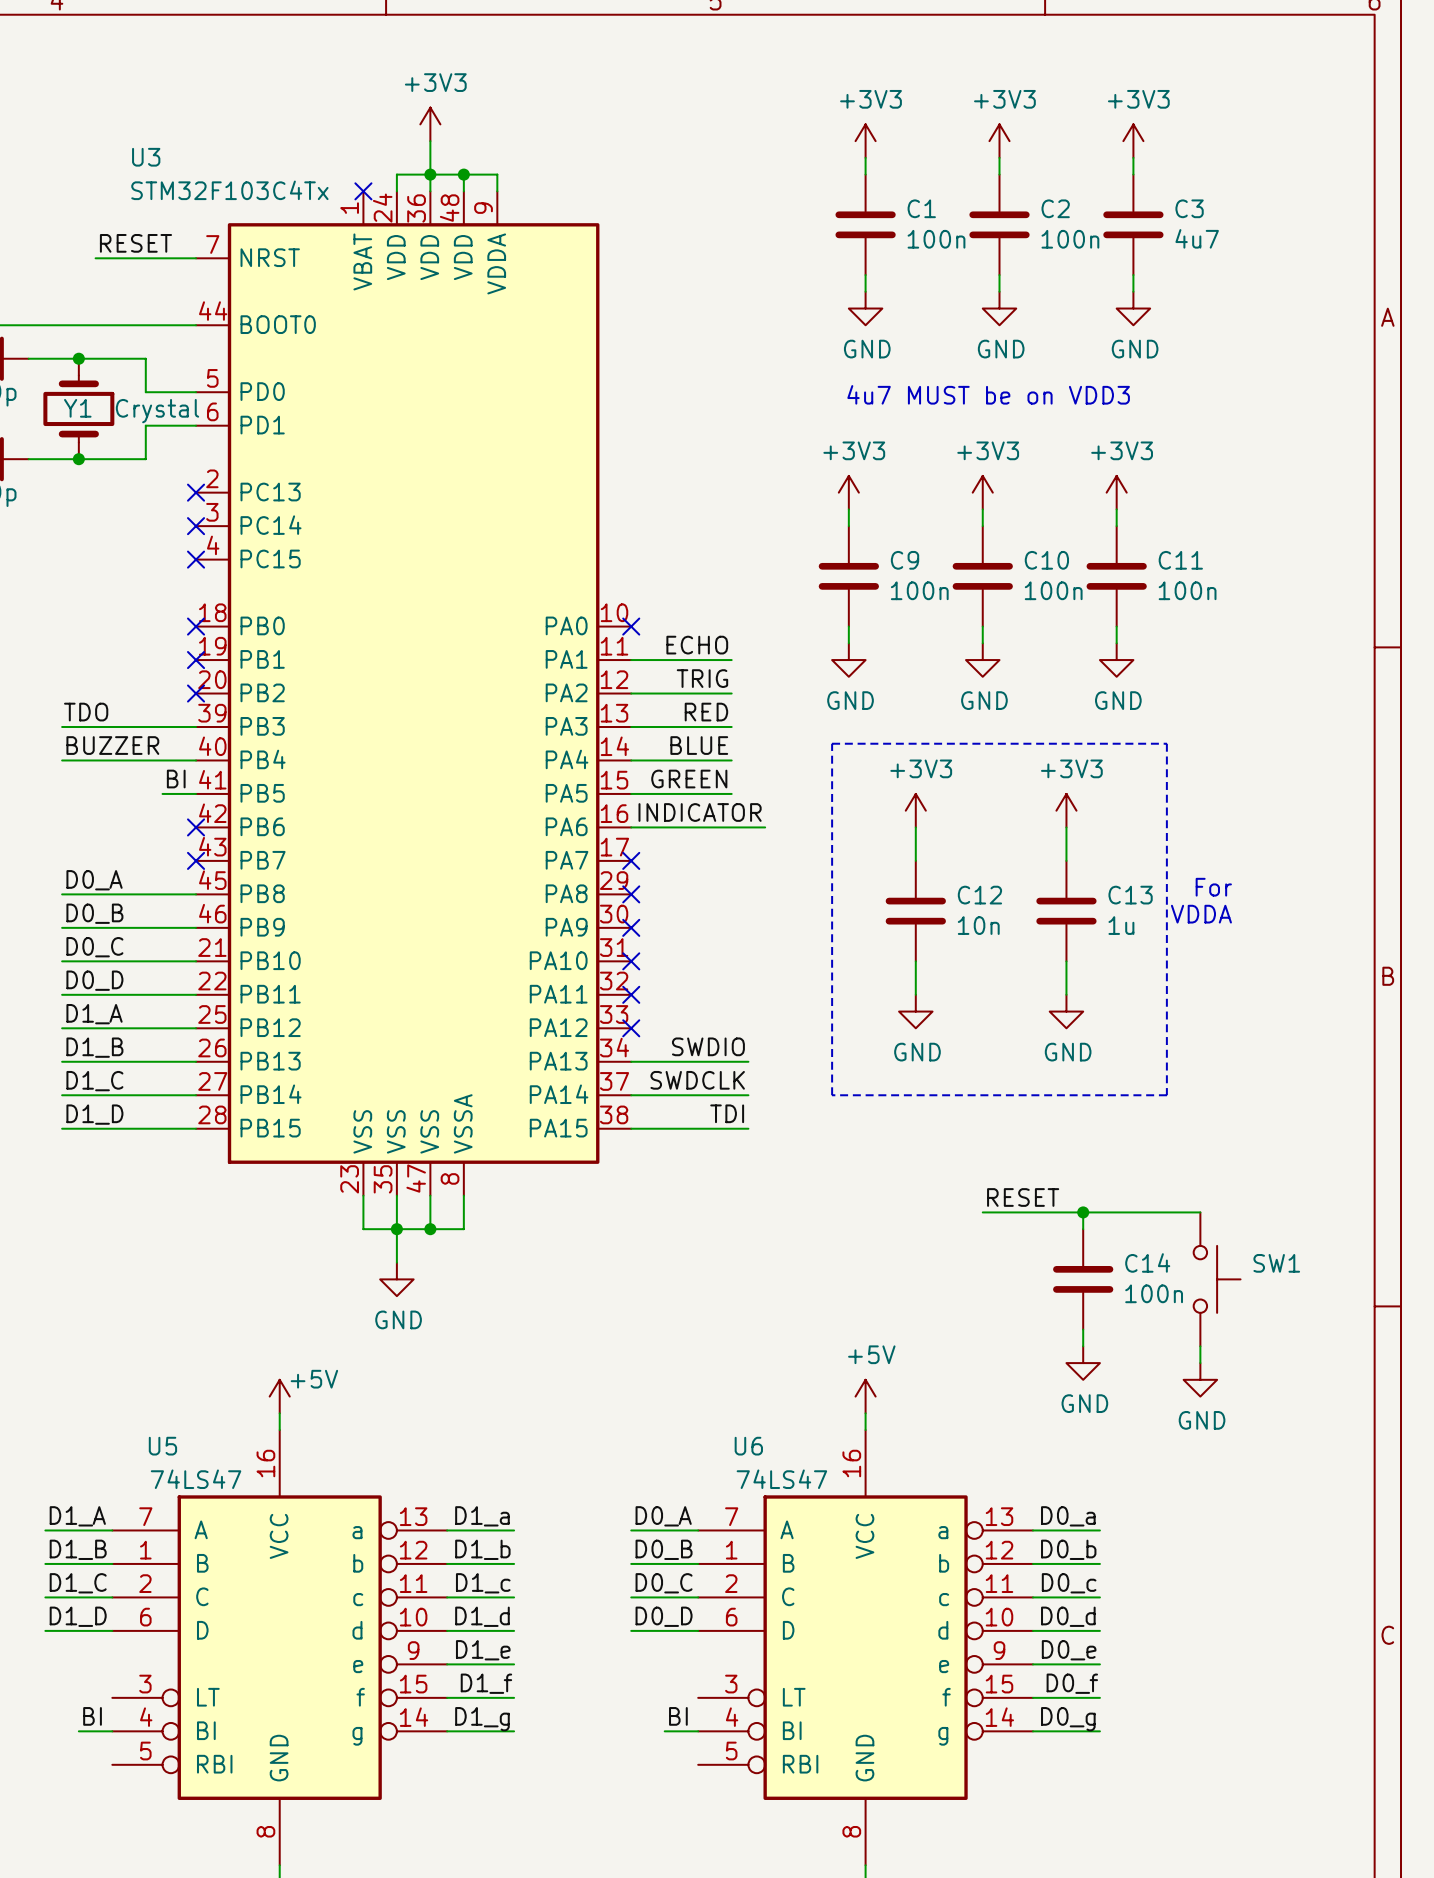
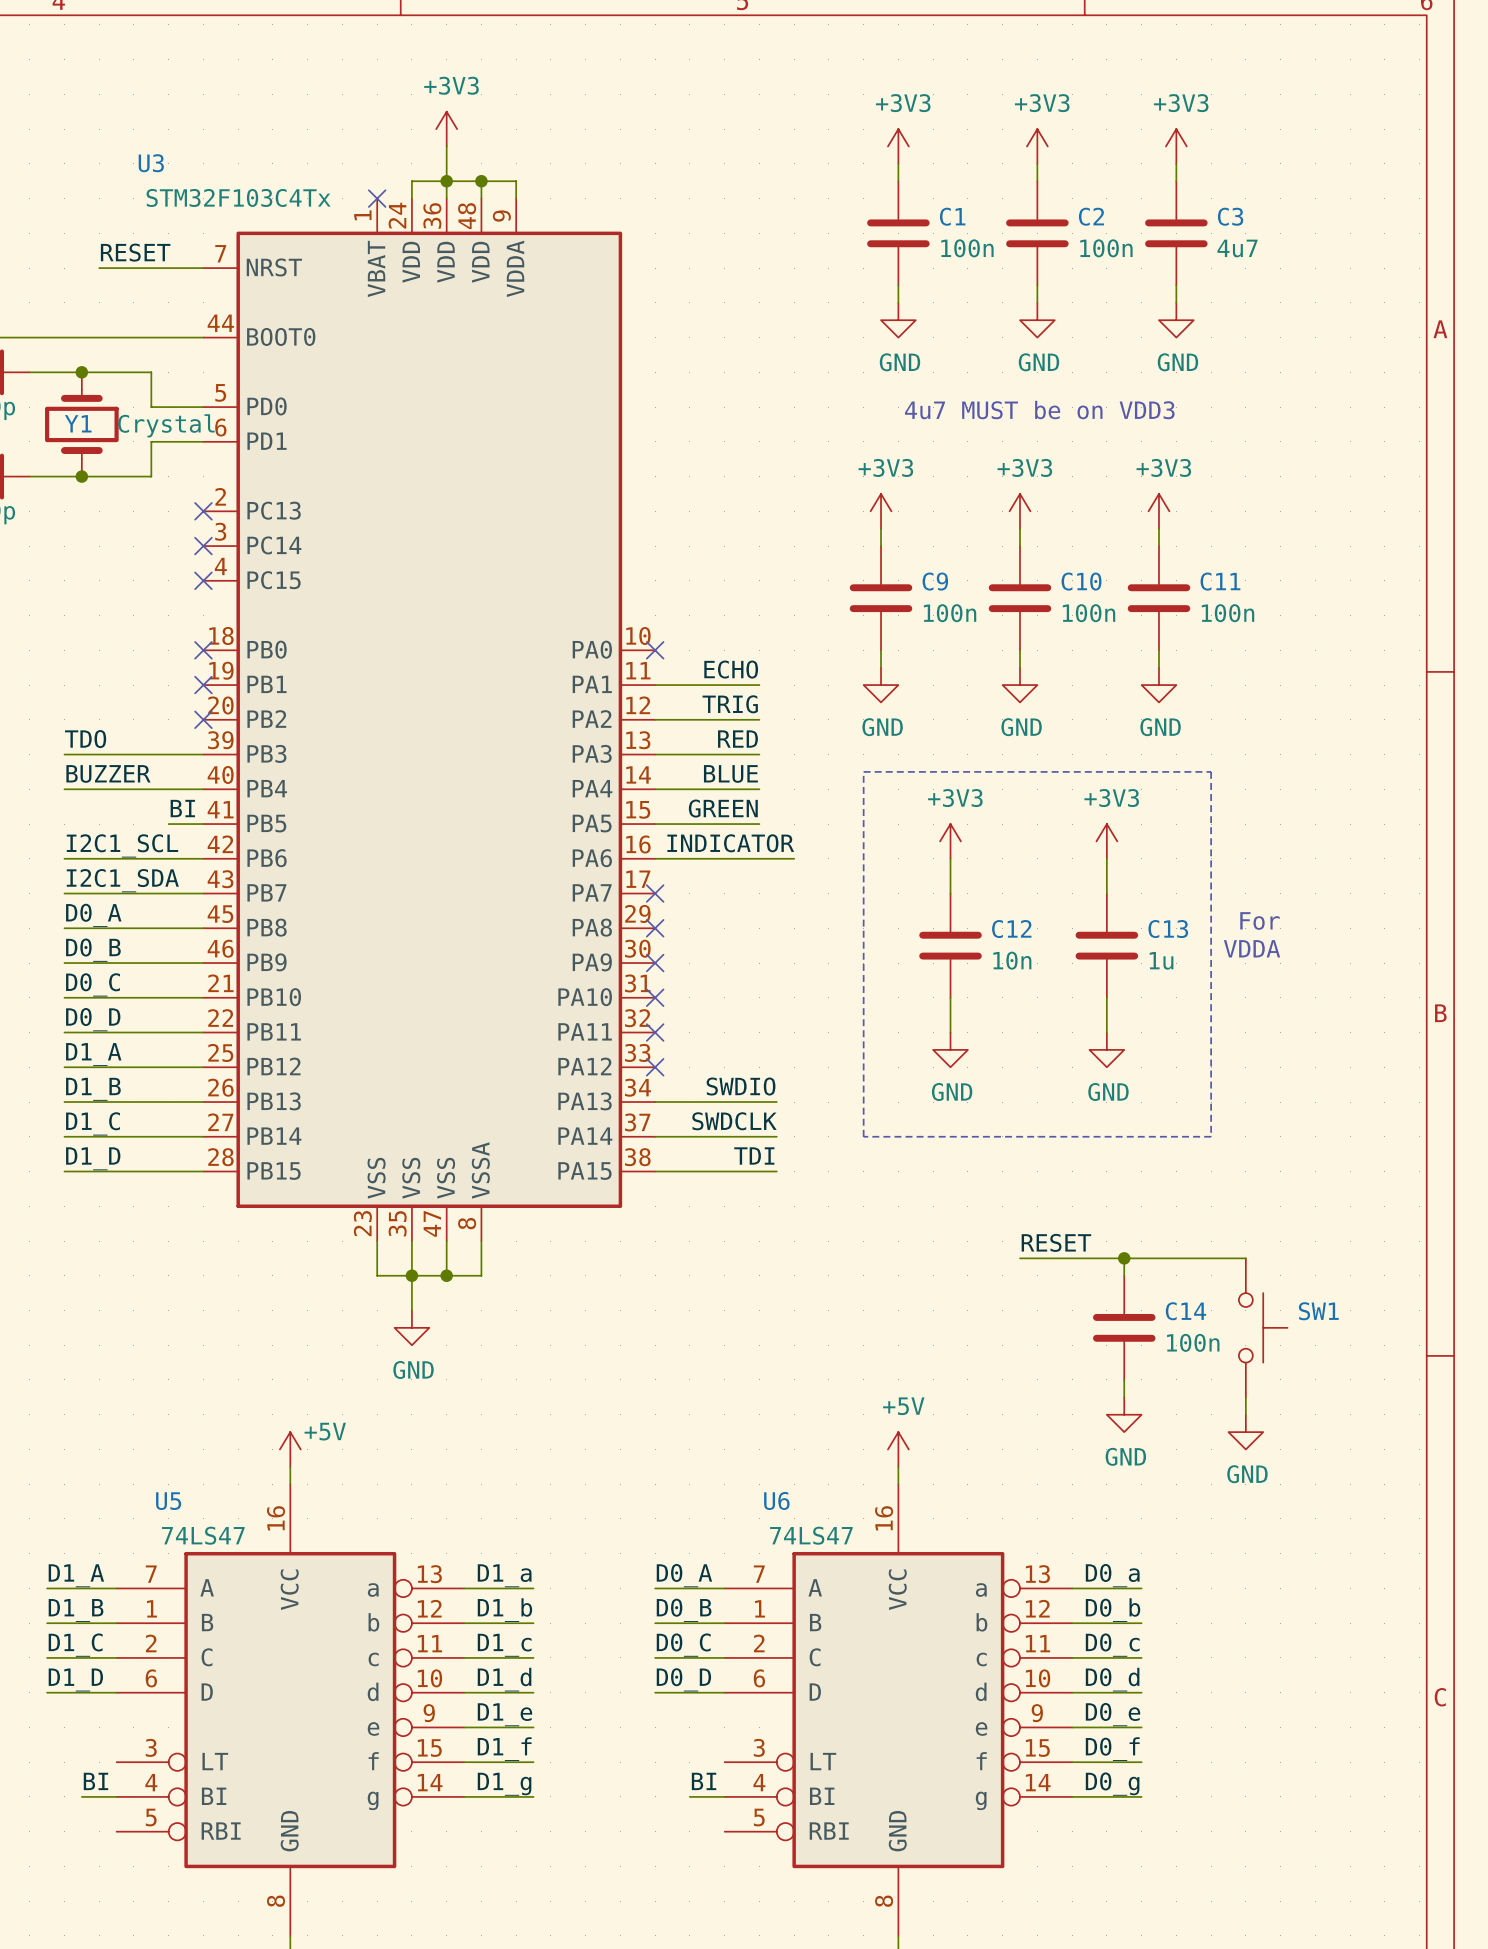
label: none -> I2C1_SCL (122, 845)
wire: none -> (64, 858) (203, 858)
no-connect mark: (196, 827) -> none
label: none -> I2C1_SDA (122, 880)
wire: none -> (64, 893) (203, 893)
no-connect mark: (196, 860) -> none

